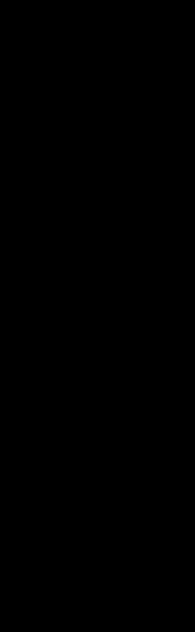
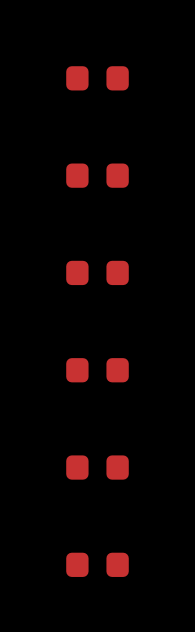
part: none -> (97, 78)
part: none -> (97, 175)
part: none -> (97, 272)
part: none -> (97, 370)
part: none -> (97, 467)
part: none -> (97, 564)

